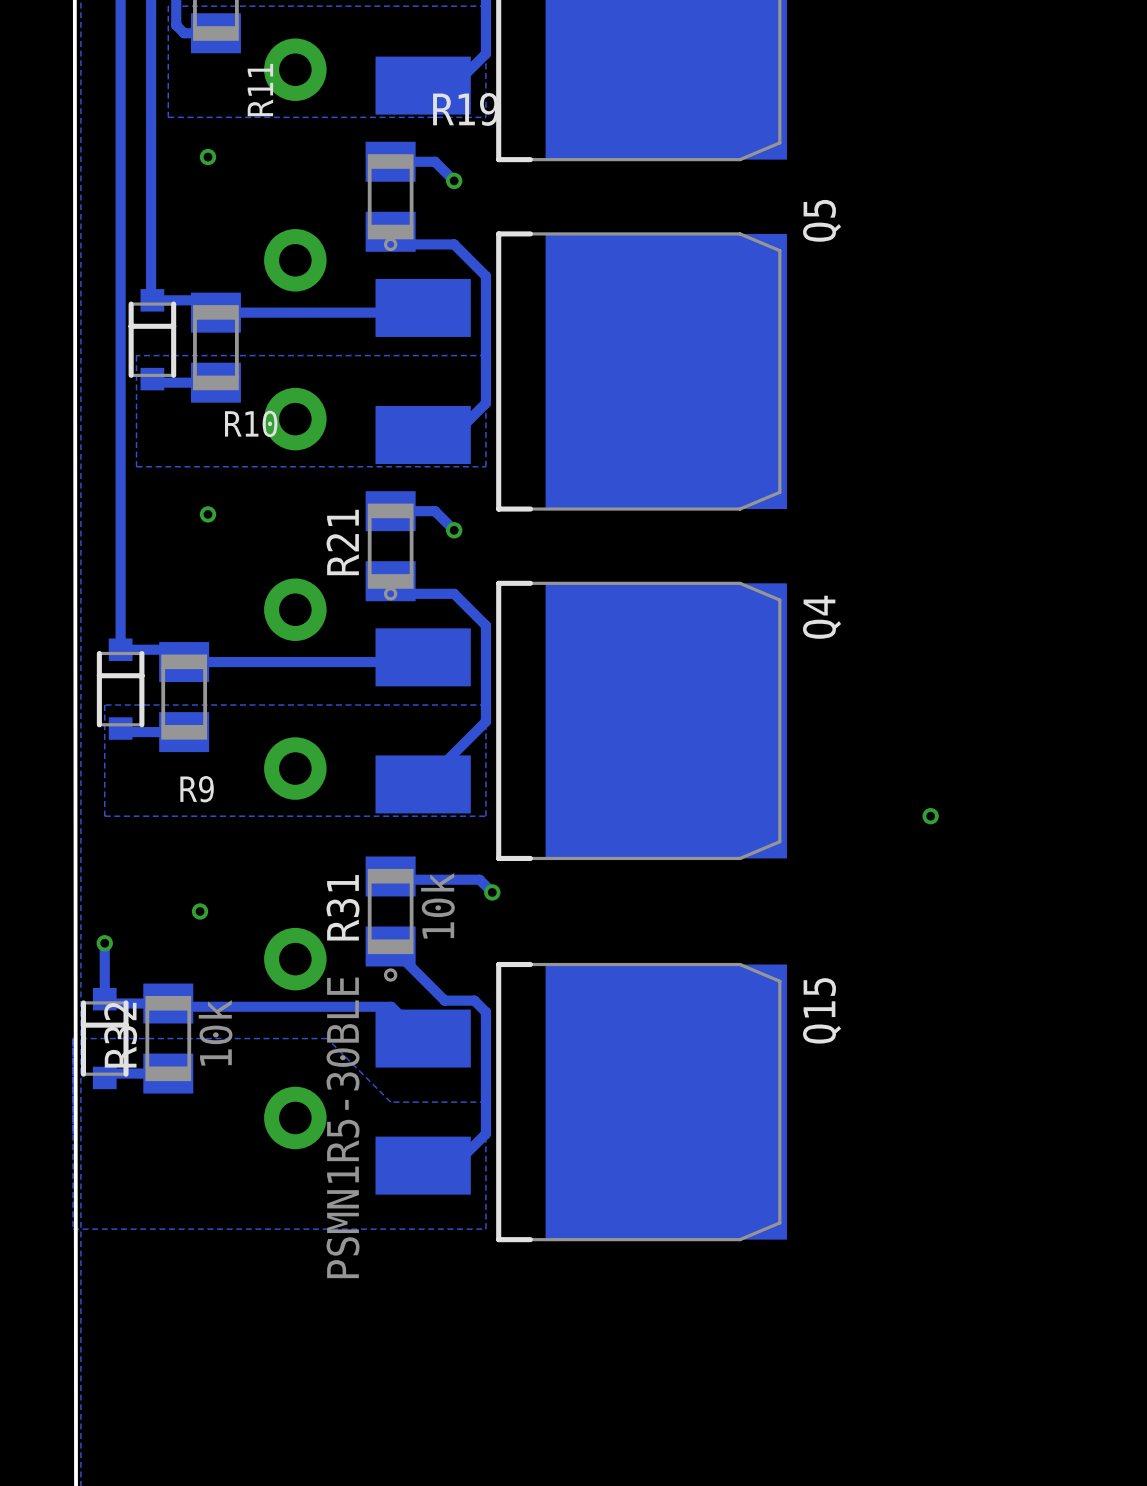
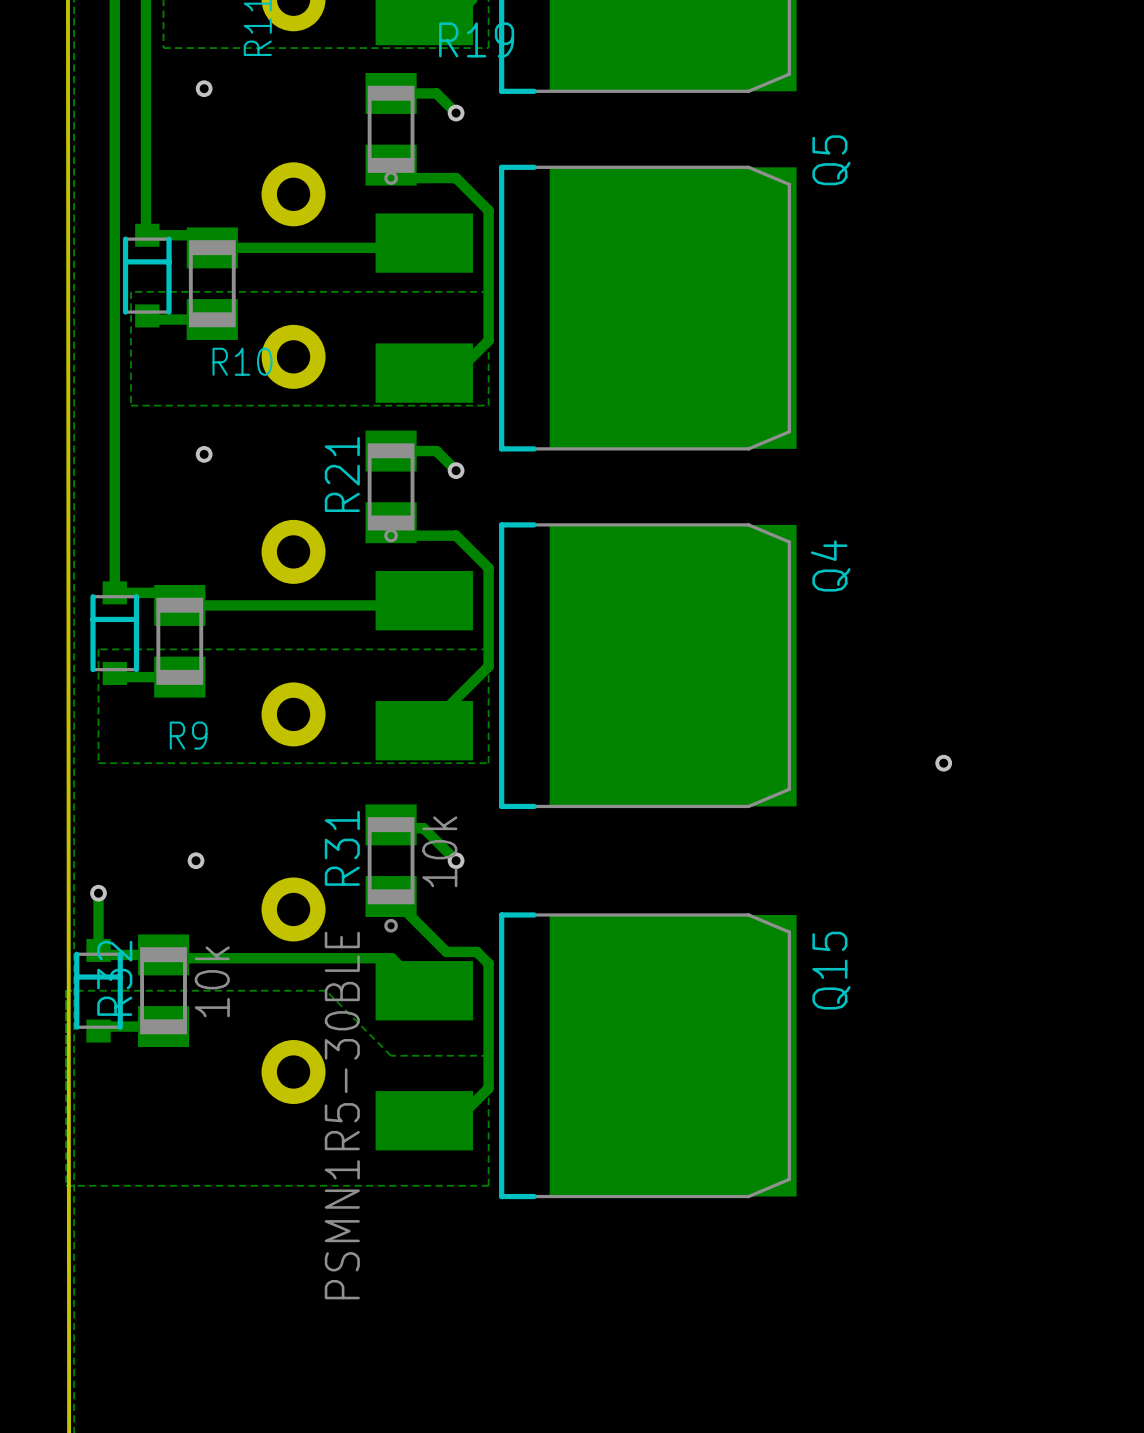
track: (422, 879) (479, 879) (492, 892) -> (423, 828) (456, 860)
via position: (492, 892) -> (456, 860)

